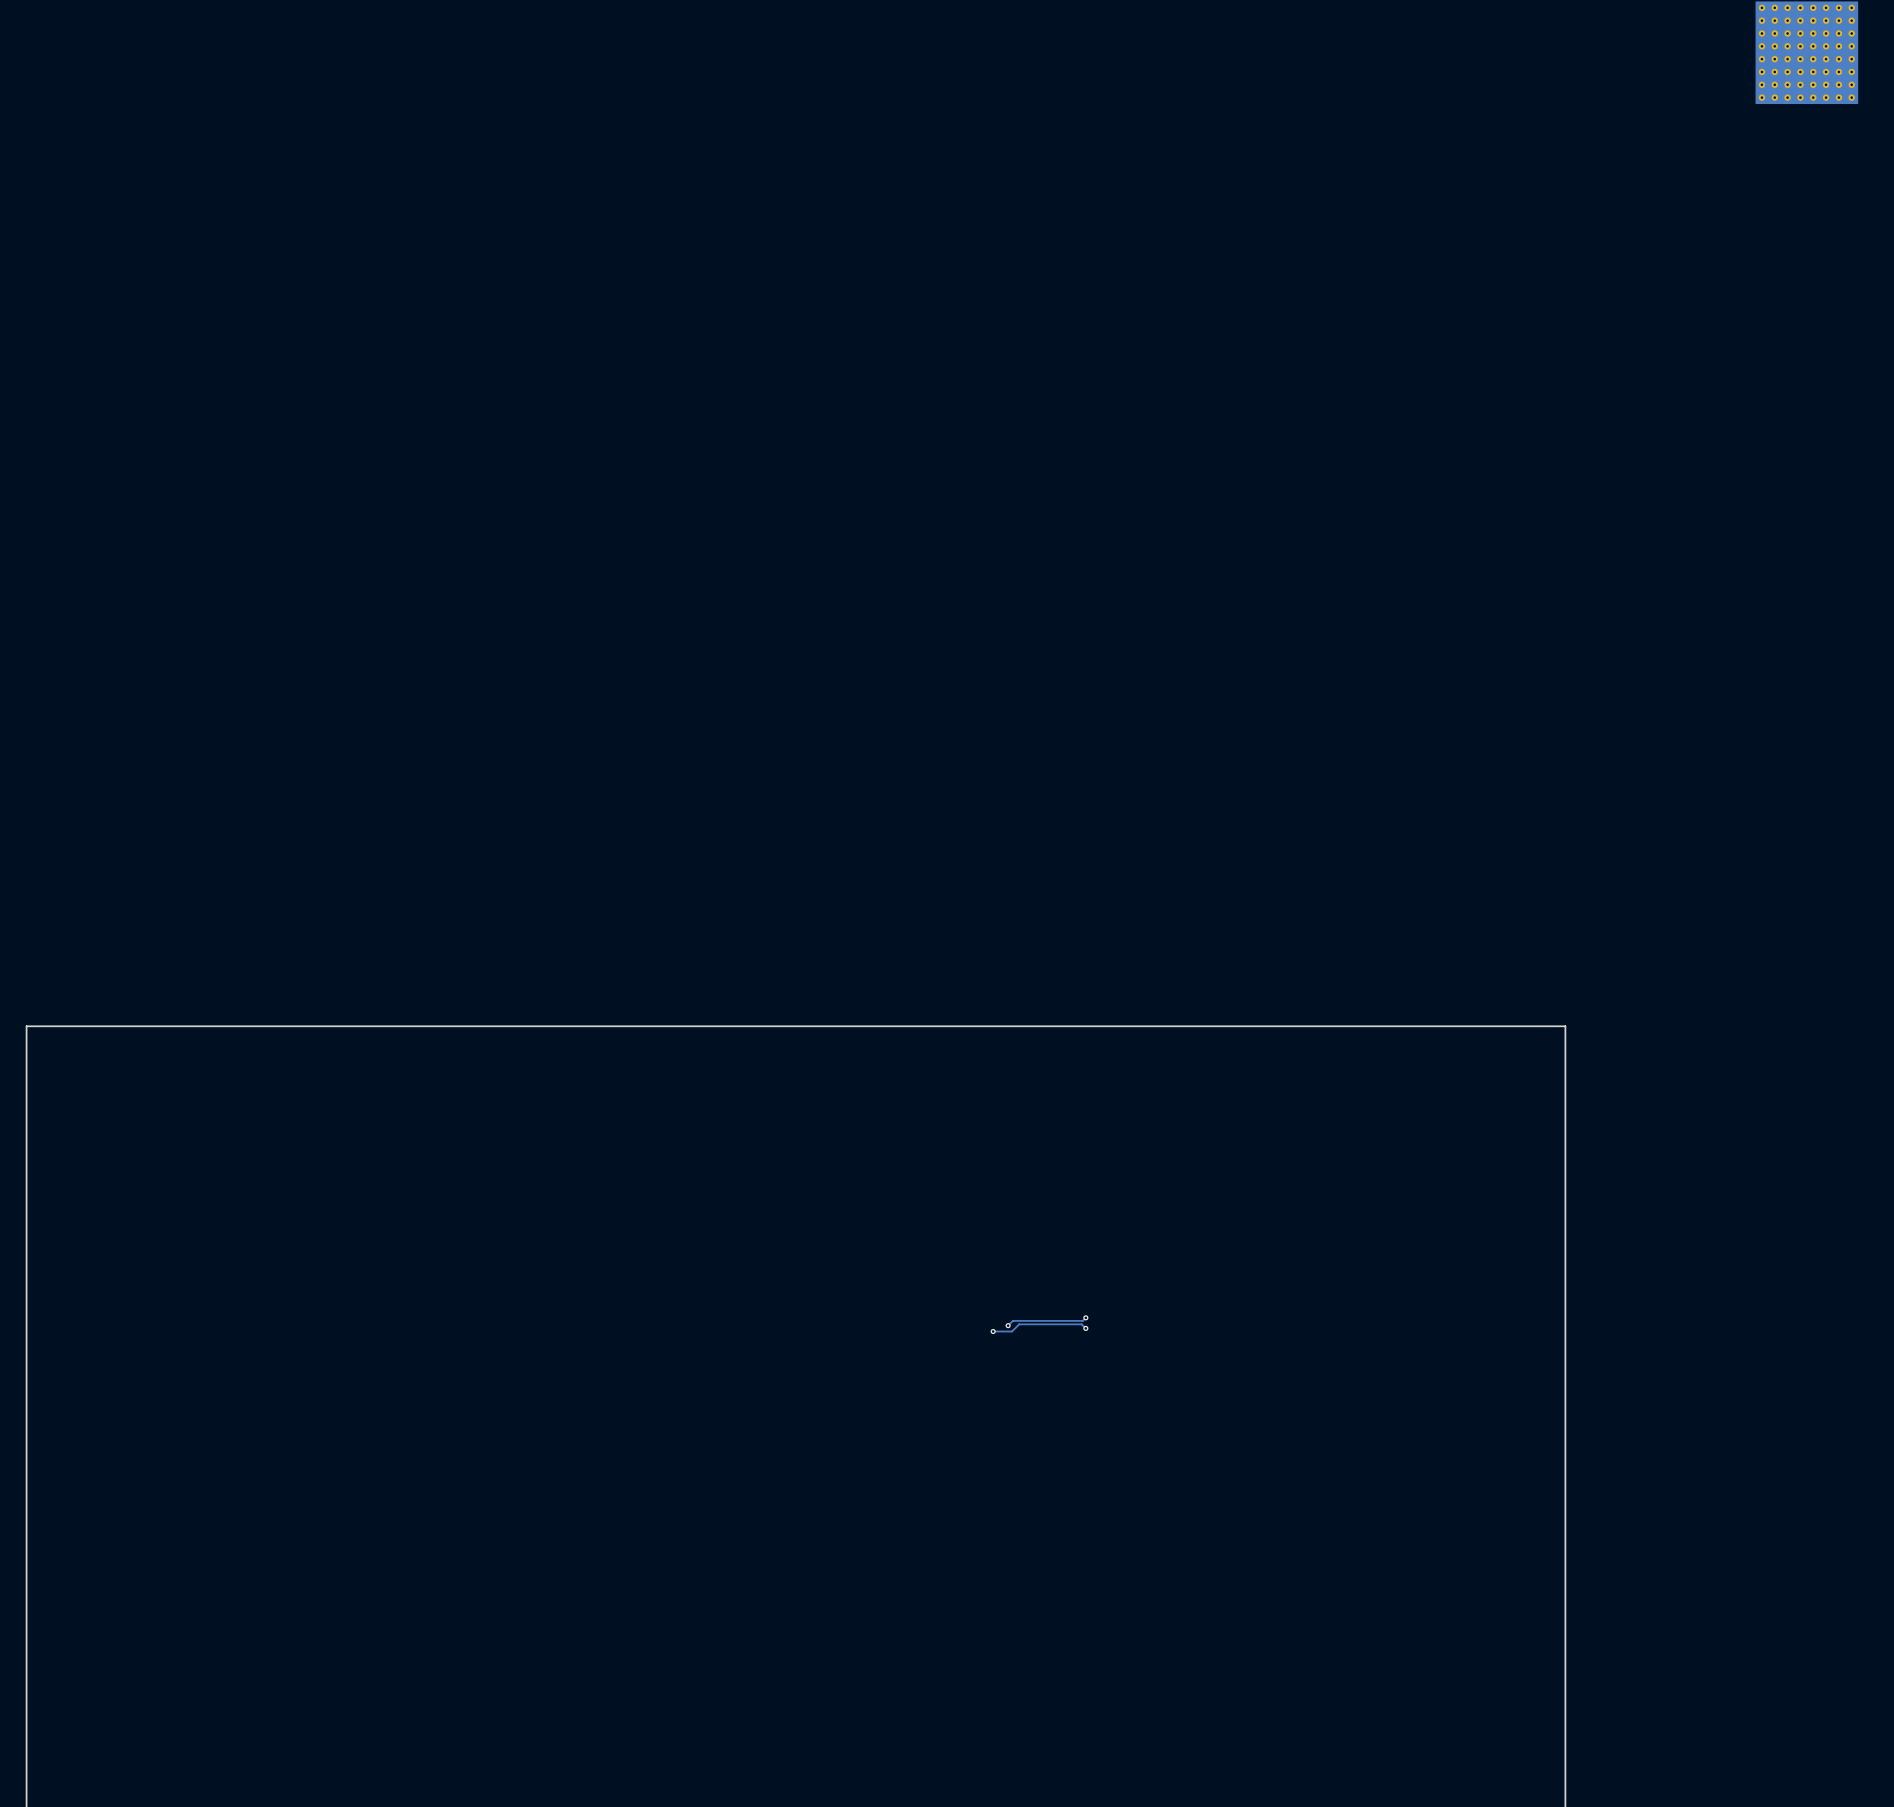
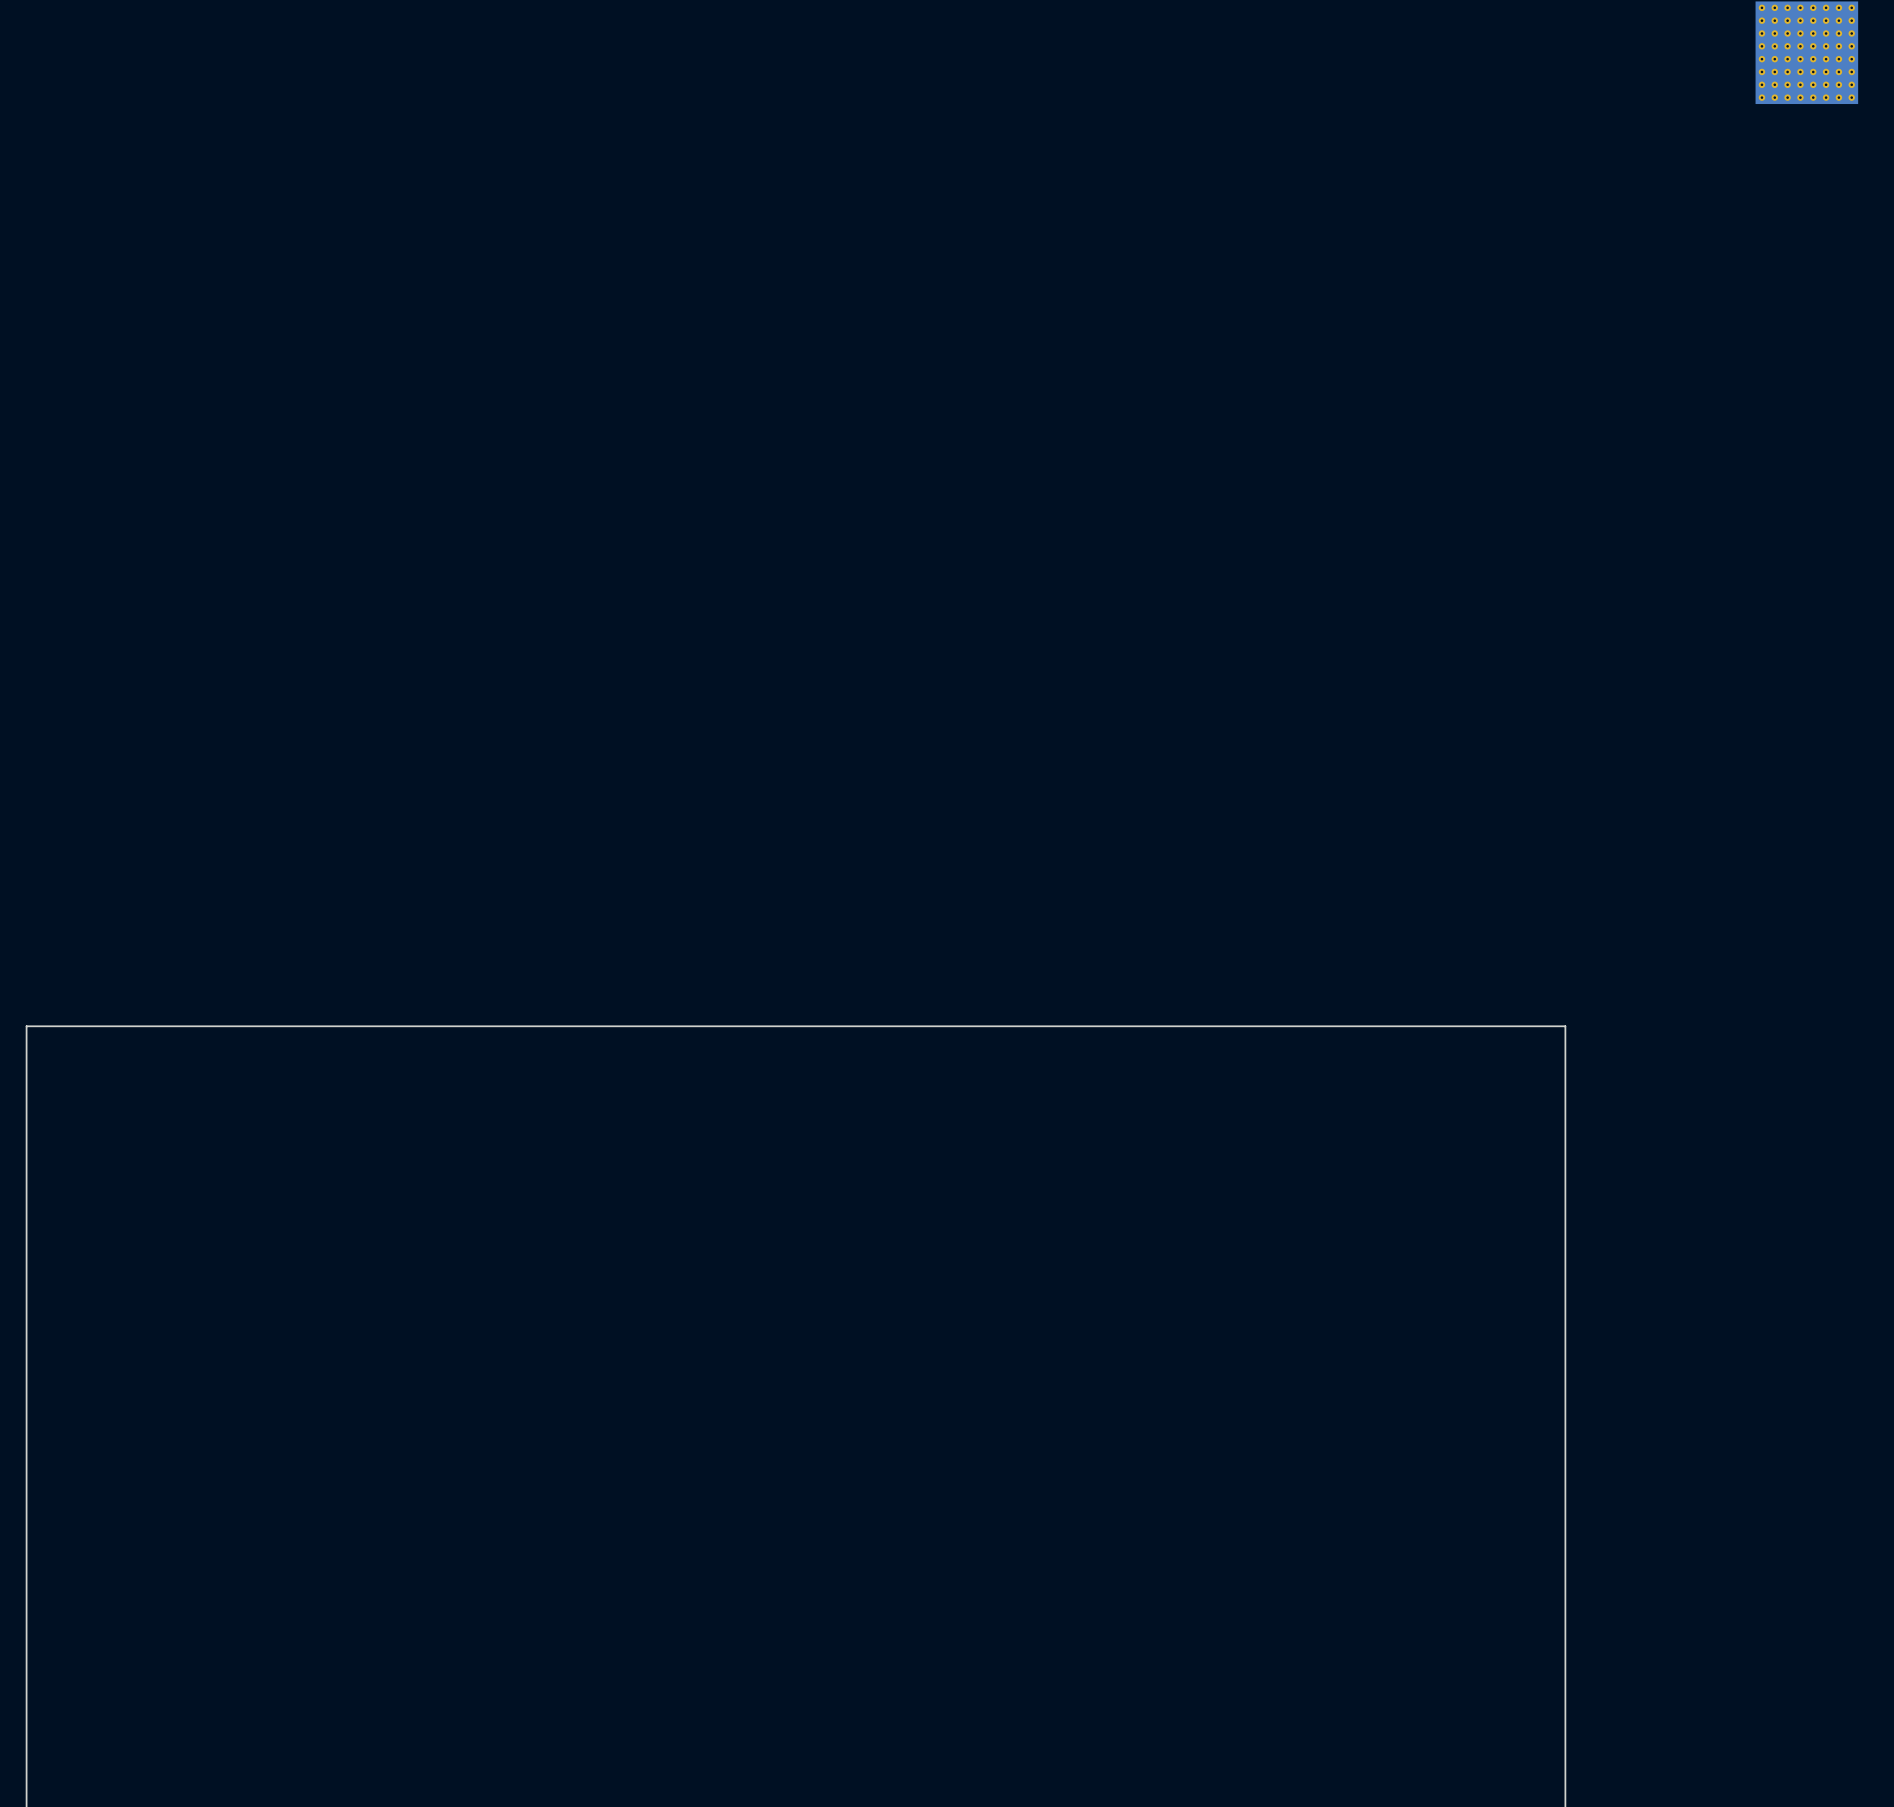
track: (1085, 1317) (1082, 1320) (1012, 1320) (1008, 1325) -> none
via: (1085, 1317) -> none
via: (1008, 1325) -> none
track: (1085, 1328) (1081, 1324) (1019, 1324) (1012, 1331) (993, 1331) -> none
via: (1085, 1328) -> none
via: (993, 1331) -> none

